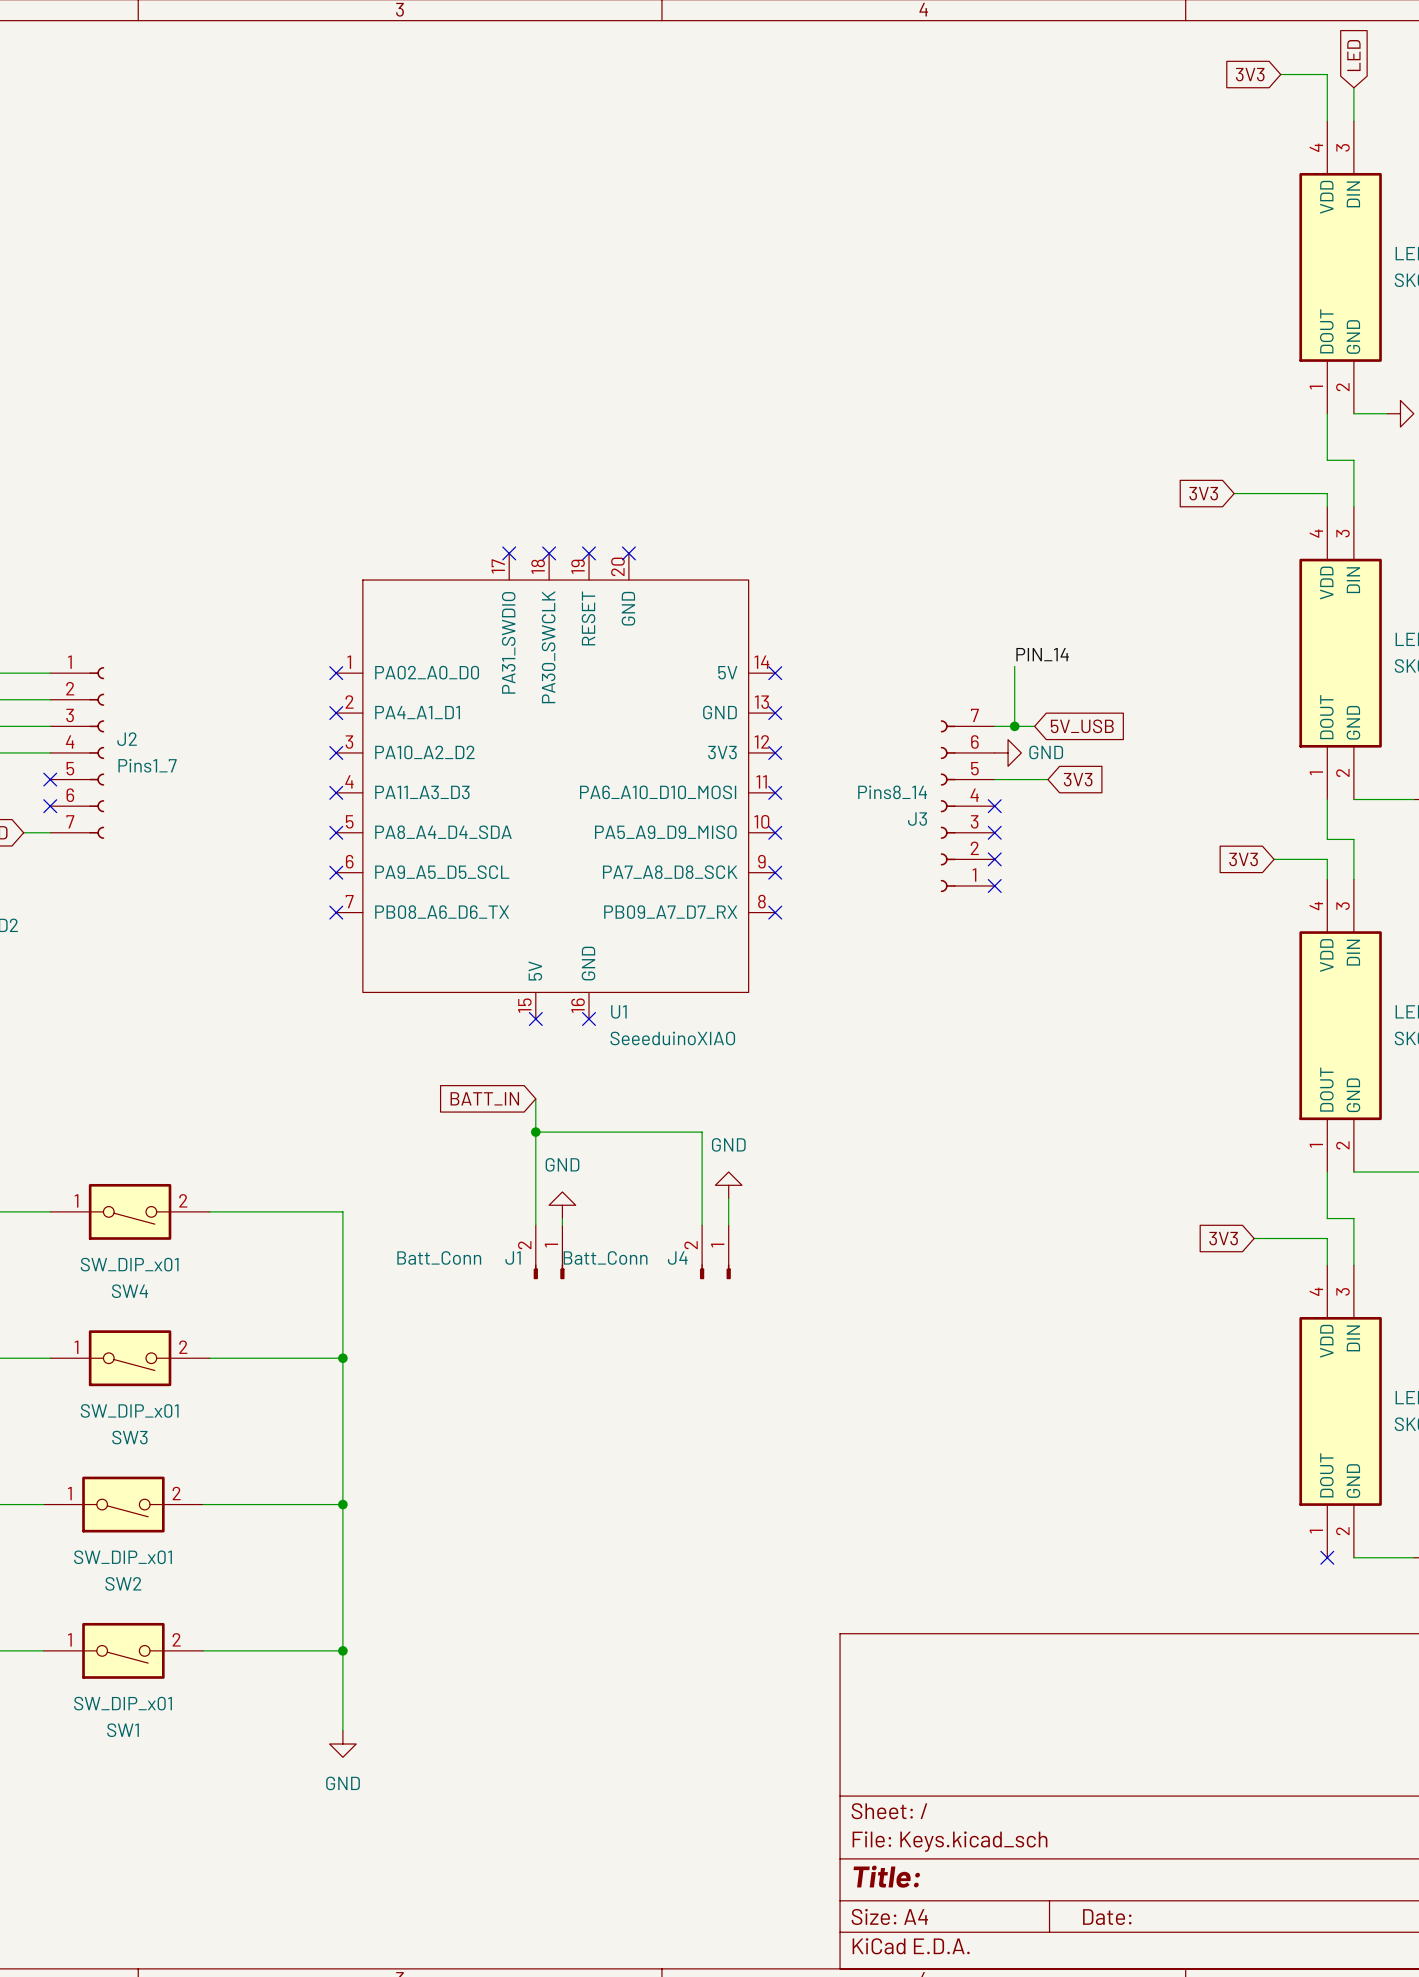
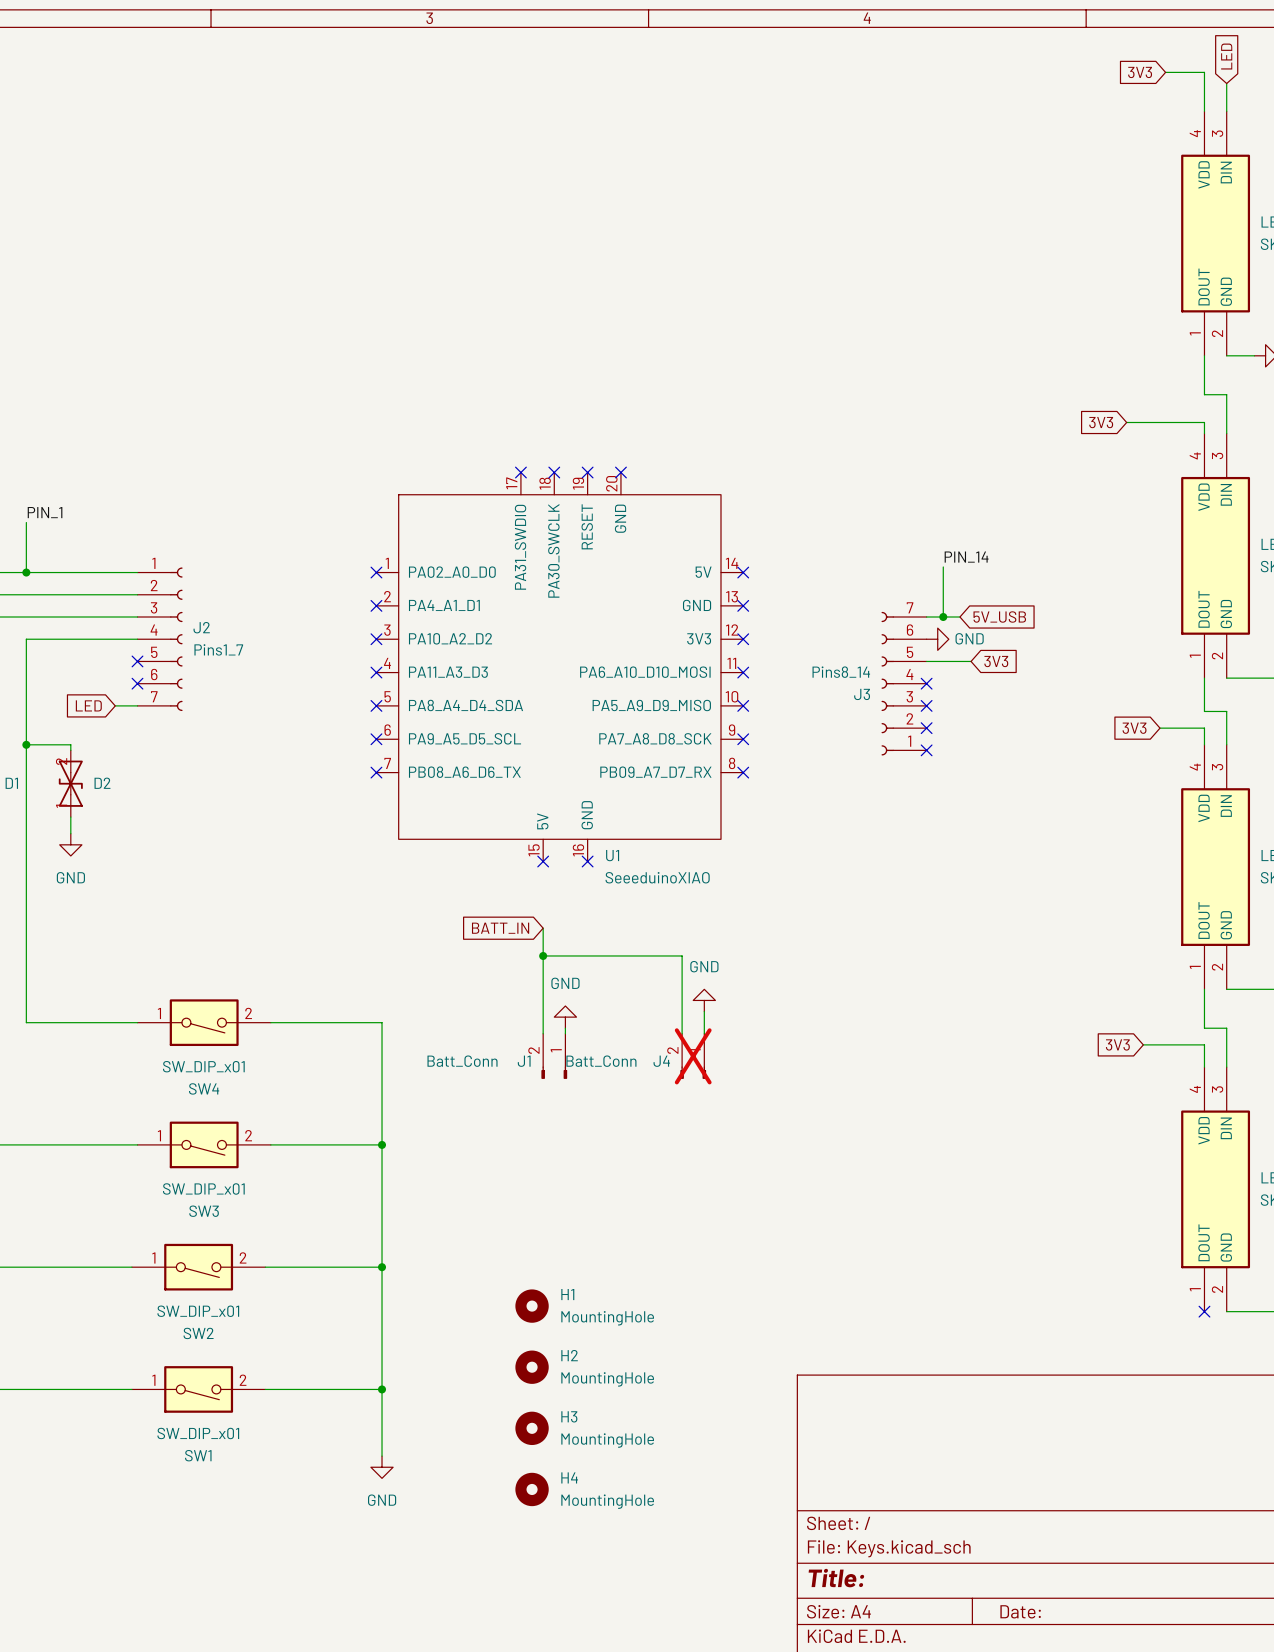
J4 do-not-place cross: none -> (693, 1056)
H1: none -> MountingHole (532, 1306)
H2: none -> MountingHole (532, 1367)
H3: none -> MountingHole (532, 1428)
H4: none -> MountingHole (532, 1489)

